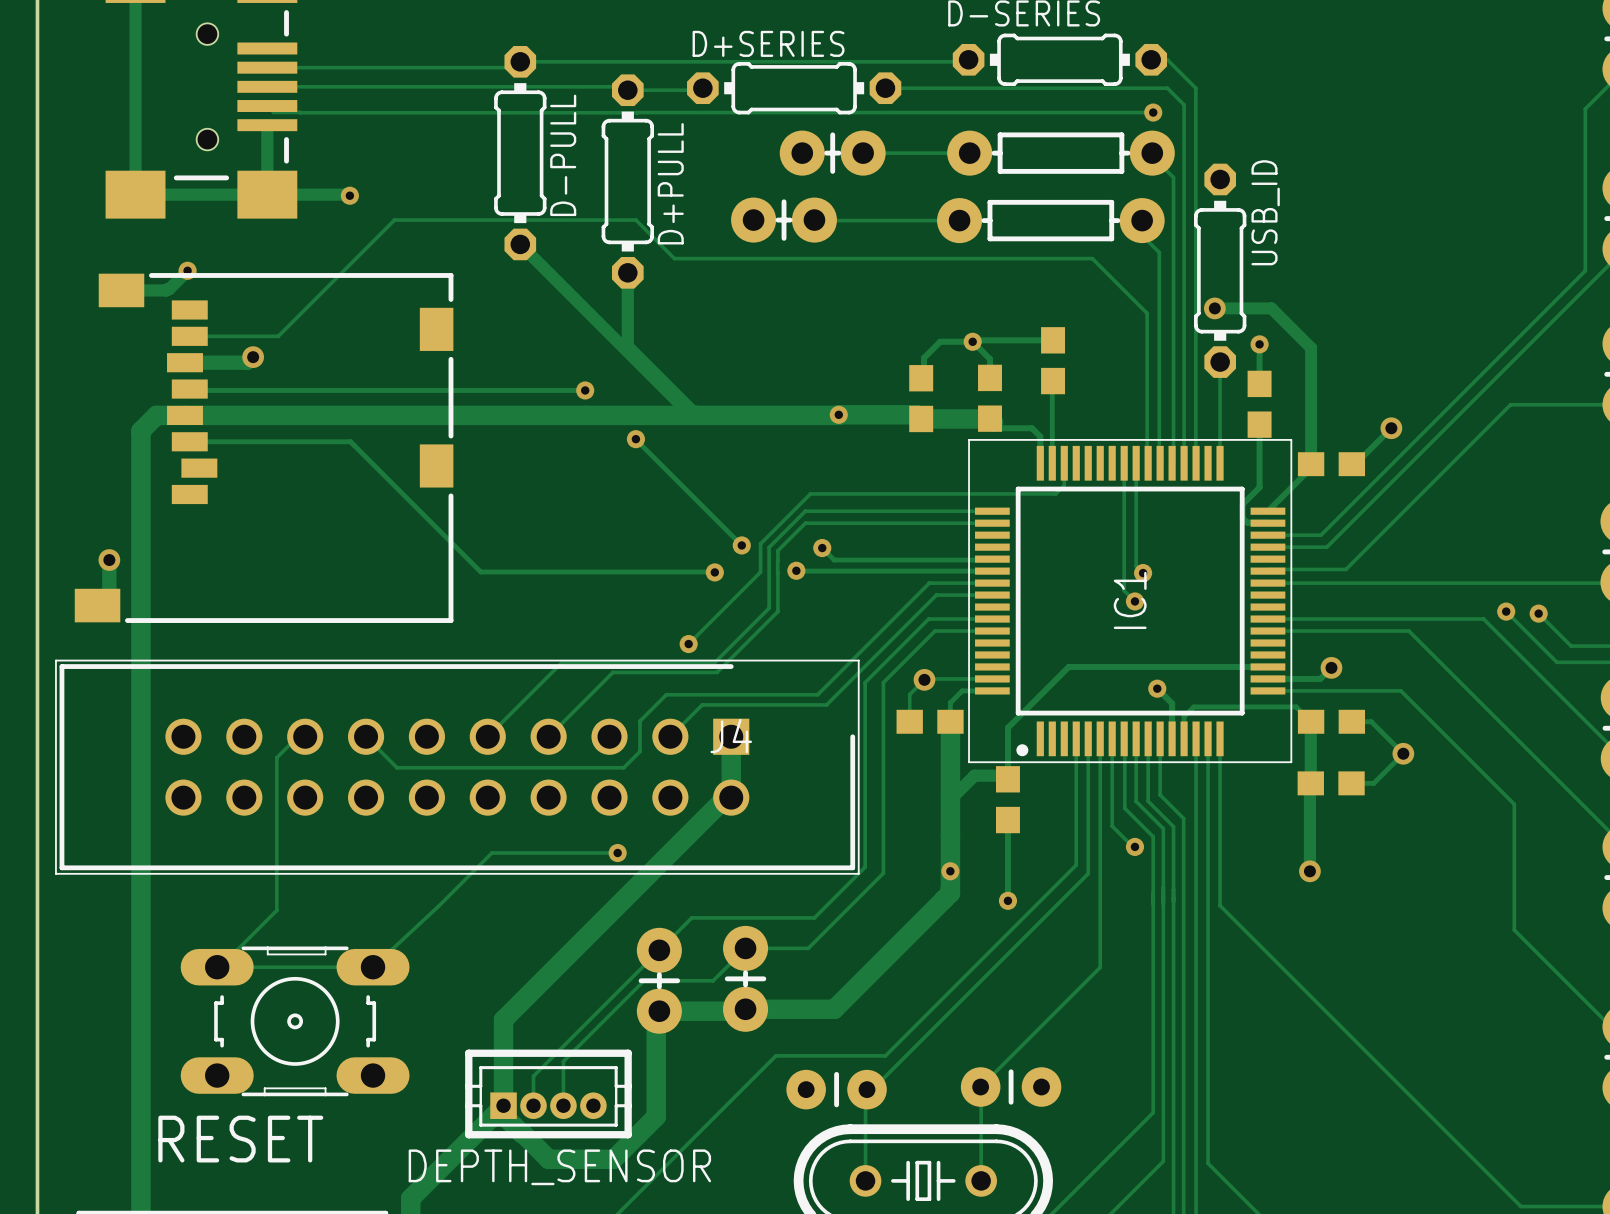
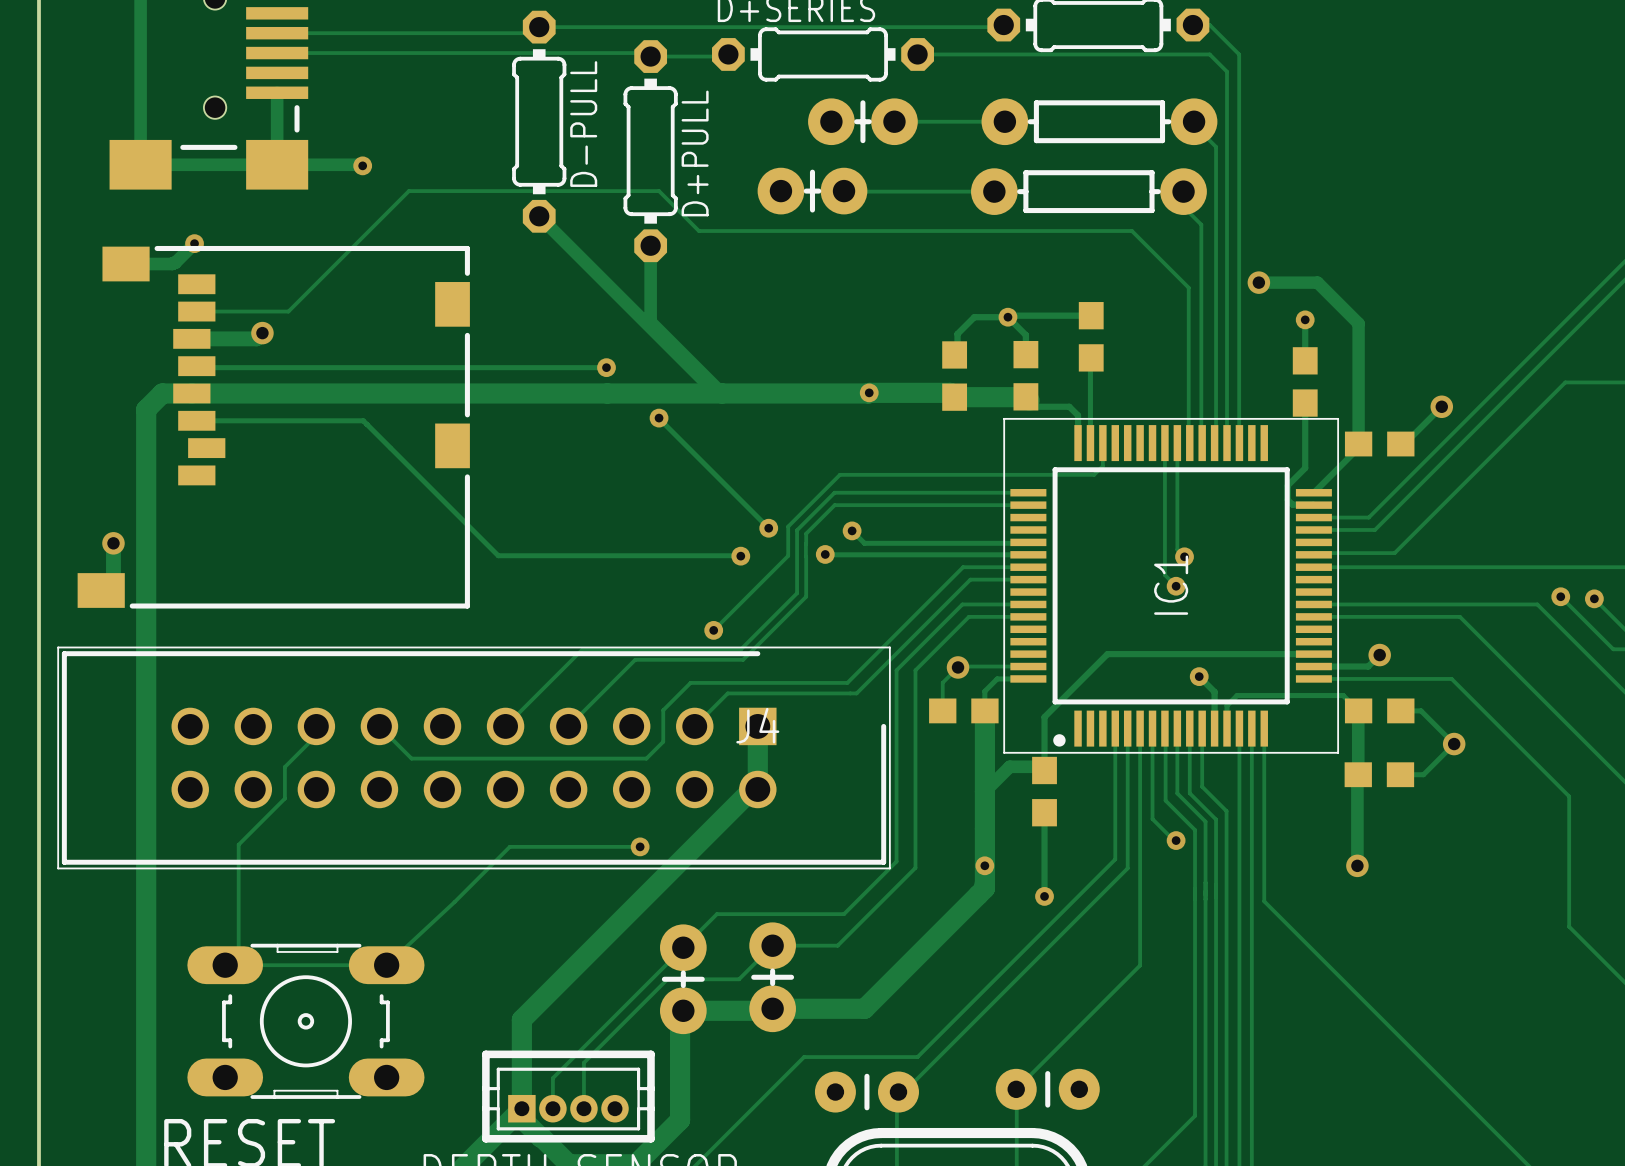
track: (267, 106) (273, 112) (637, 112) -> none
track: (637, 112) (1153, 112) -> none
via: (1153, 112) -> none
USB_ID: (1220, 270) -> none
track: (1220, 362) (1220, 354) (1220, 463) -> none
track: (305, 736) (297, 736) (276, 757) (276, 910) (220, 967) -> (316, 726) (316, 735) (284, 767) (284, 798) (238, 844) (238, 951) (225, 965)

